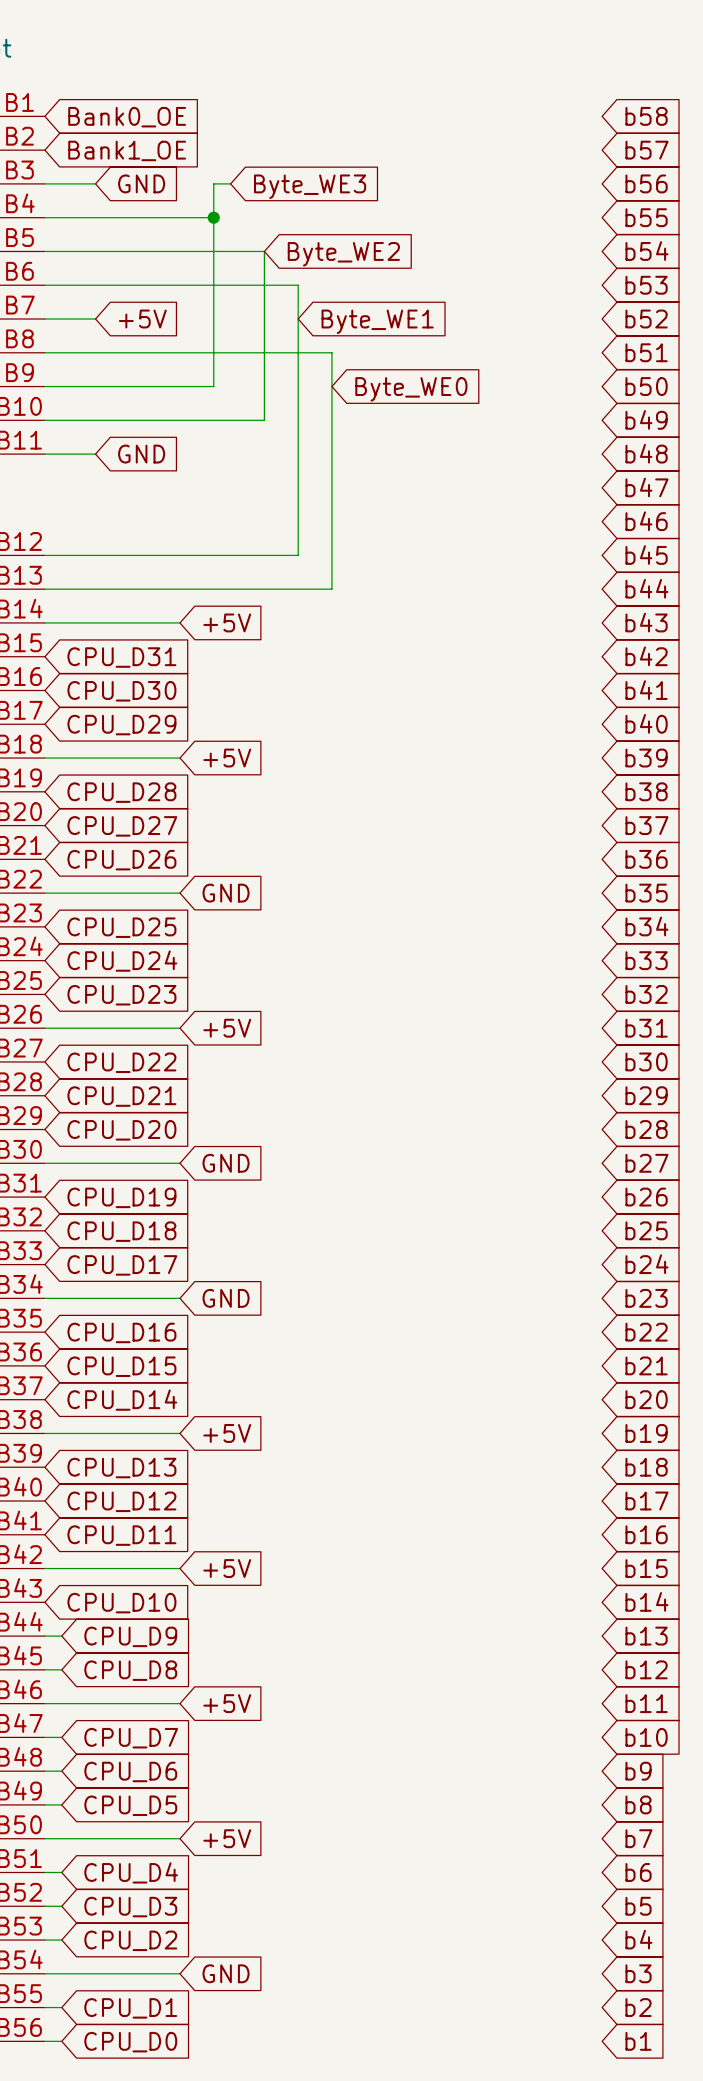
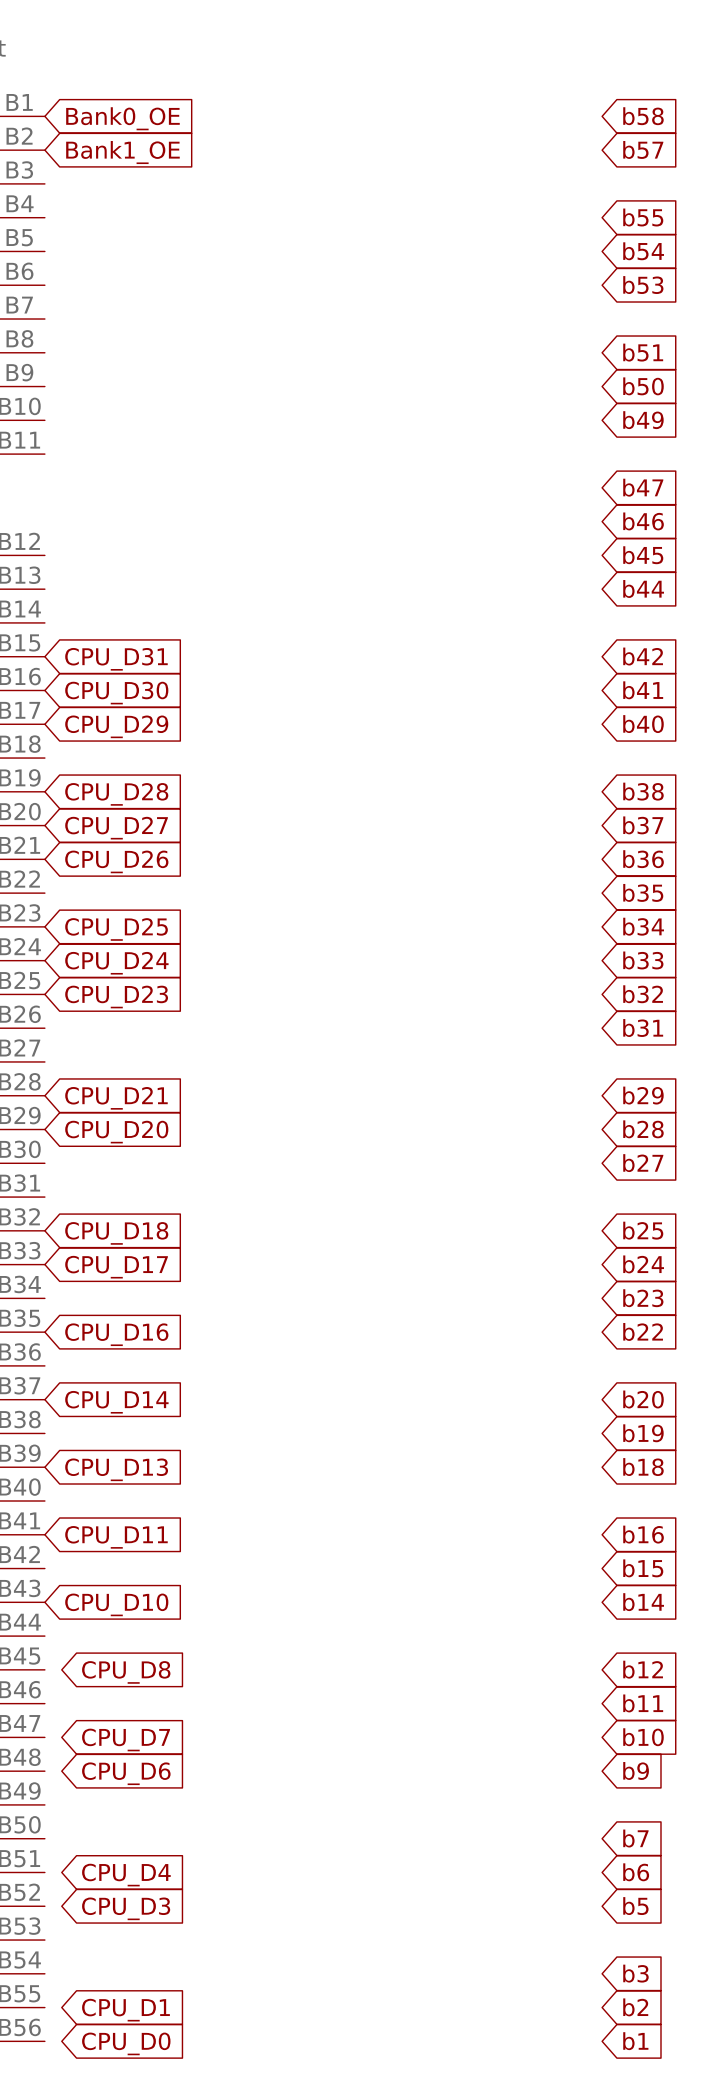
wire: (44, 183) (95, 183) -> none
global label: GND (141, 183) -> none
wire: (230, 183) (213, 183) (213, 386) (44, 386) -> none
global label: b56 (646, 183) -> none
global label: Byte_WE3 (310, 186) -> none
wire: (44, 217) (213, 217) -> none
junction: (213, 217) -> none
wire: (44, 251) (264, 251) (264, 420) (44, 420) -> none
global label: Byte_WE2 (343, 254) -> none
wire: (44, 285) (298, 285) (298, 555) (44, 555) -> none
wire: (44, 319) (95, 319) -> none
global label: +5V (142, 319) -> none
global label: b52 (646, 319) -> none
global label: Byte_WE1 (377, 321) -> none
wire: (44, 352) (331, 352) (331, 589) (44, 589) -> none
global label: Byte_WE0 (411, 389) -> none
global label: b48 (646, 453) -> none
wire: (44, 454) (95, 454) -> none
global label: GND (141, 454) -> none
wire: (44, 622) (179, 622) -> none
global label: +5V (227, 622) -> none
global label: b43 (646, 622) -> none
wire: (44, 758) (179, 758) -> none
global label: +5V (227, 758) -> none
global label: b39 (646, 758) -> none
wire: (44, 893) (179, 893) -> none
global label: GND (226, 893) -> none
wire: (44, 1028) (179, 1028) -> none
global label: +5V (227, 1028) -> none
global label: b30 (646, 1061) -> none
global label: CPU_D22 (121, 1062) -> none
wire: (44, 1163) (179, 1163) -> none
global label: GND (226, 1163) -> none
global label: CPU_D19 (121, 1197) -> none
global label: b26 (646, 1197) -> none
wire: (44, 1298) (179, 1298) -> none
global label: GND (226, 1298) -> none
global label: b21 (646, 1365) -> none
global label: CPU_D15 (121, 1366) -> none
wire: (44, 1433) (179, 1433) -> none
global label: +5V (227, 1433) -> none
global label: CPU_D12 (121, 1501) -> none
global label: b17 (646, 1501) -> none
wire: (44, 1568) (179, 1568) -> none
global label: +5V (227, 1568) -> none
wire: (44, 1636) (61, 1636) -> none
global label: CPU_D9 (130, 1636) -> none
global label: b13 (646, 1636) -> none
wire: (44, 1669) (61, 1669) -> none
wire: (44, 1703) (179, 1703) -> none
global label: +5V (227, 1703) -> none
wire: (44, 1737) (61, 1737) -> none
wire: (44, 1771) (61, 1771) -> none
wire: (44, 1804) (61, 1804) -> none
global label: b8 (638, 1804) -> none
global label: CPU_D5 (130, 1805) -> none
wire: (44, 1838) (179, 1838) -> none
global label: +5V (227, 1838) -> none
wire: (44, 1872) (61, 1872) -> none
wire: (44, 1906) (61, 1906) -> none
global label: b4 (638, 1939) -> none
wire: (44, 1940) (61, 1940) -> none
global label: CPU_D2 (130, 1940) -> none
wire: (44, 1973) (179, 1973) -> none
global label: GND (226, 1973) -> none
wire: (44, 2007) (61, 2007) -> none
wire: (44, 2041) (61, 2041) -> none

